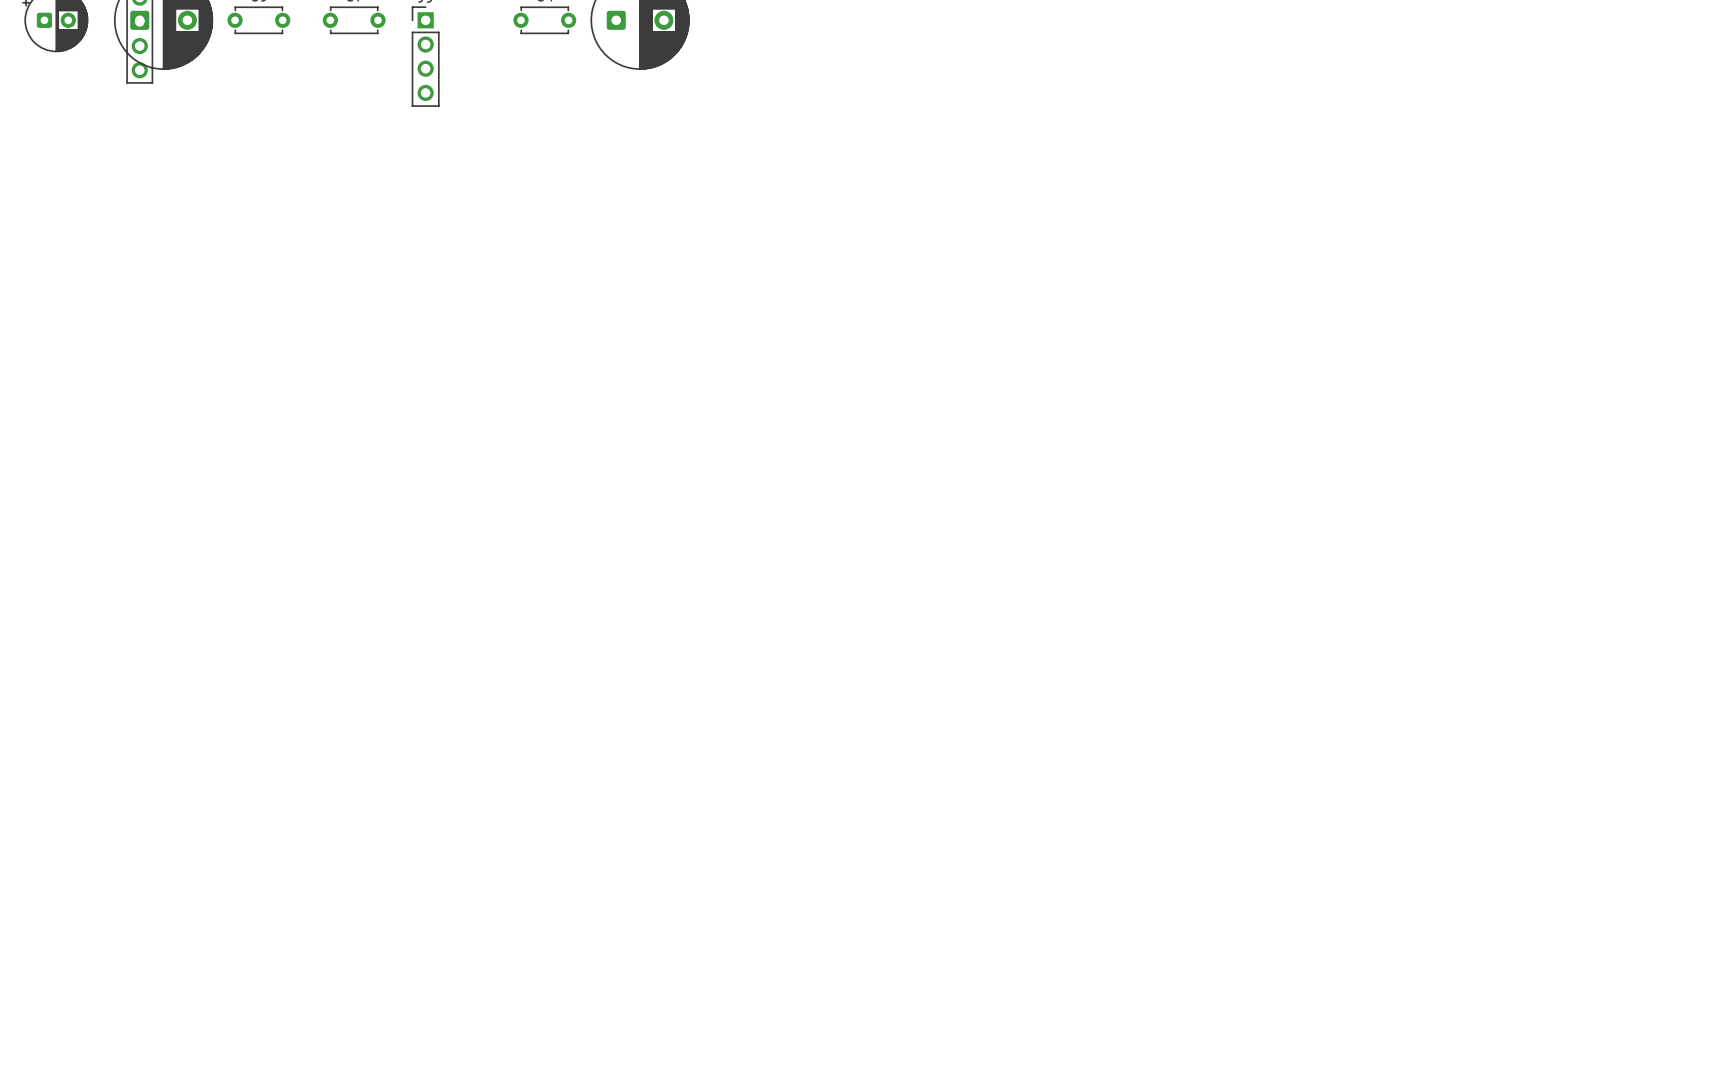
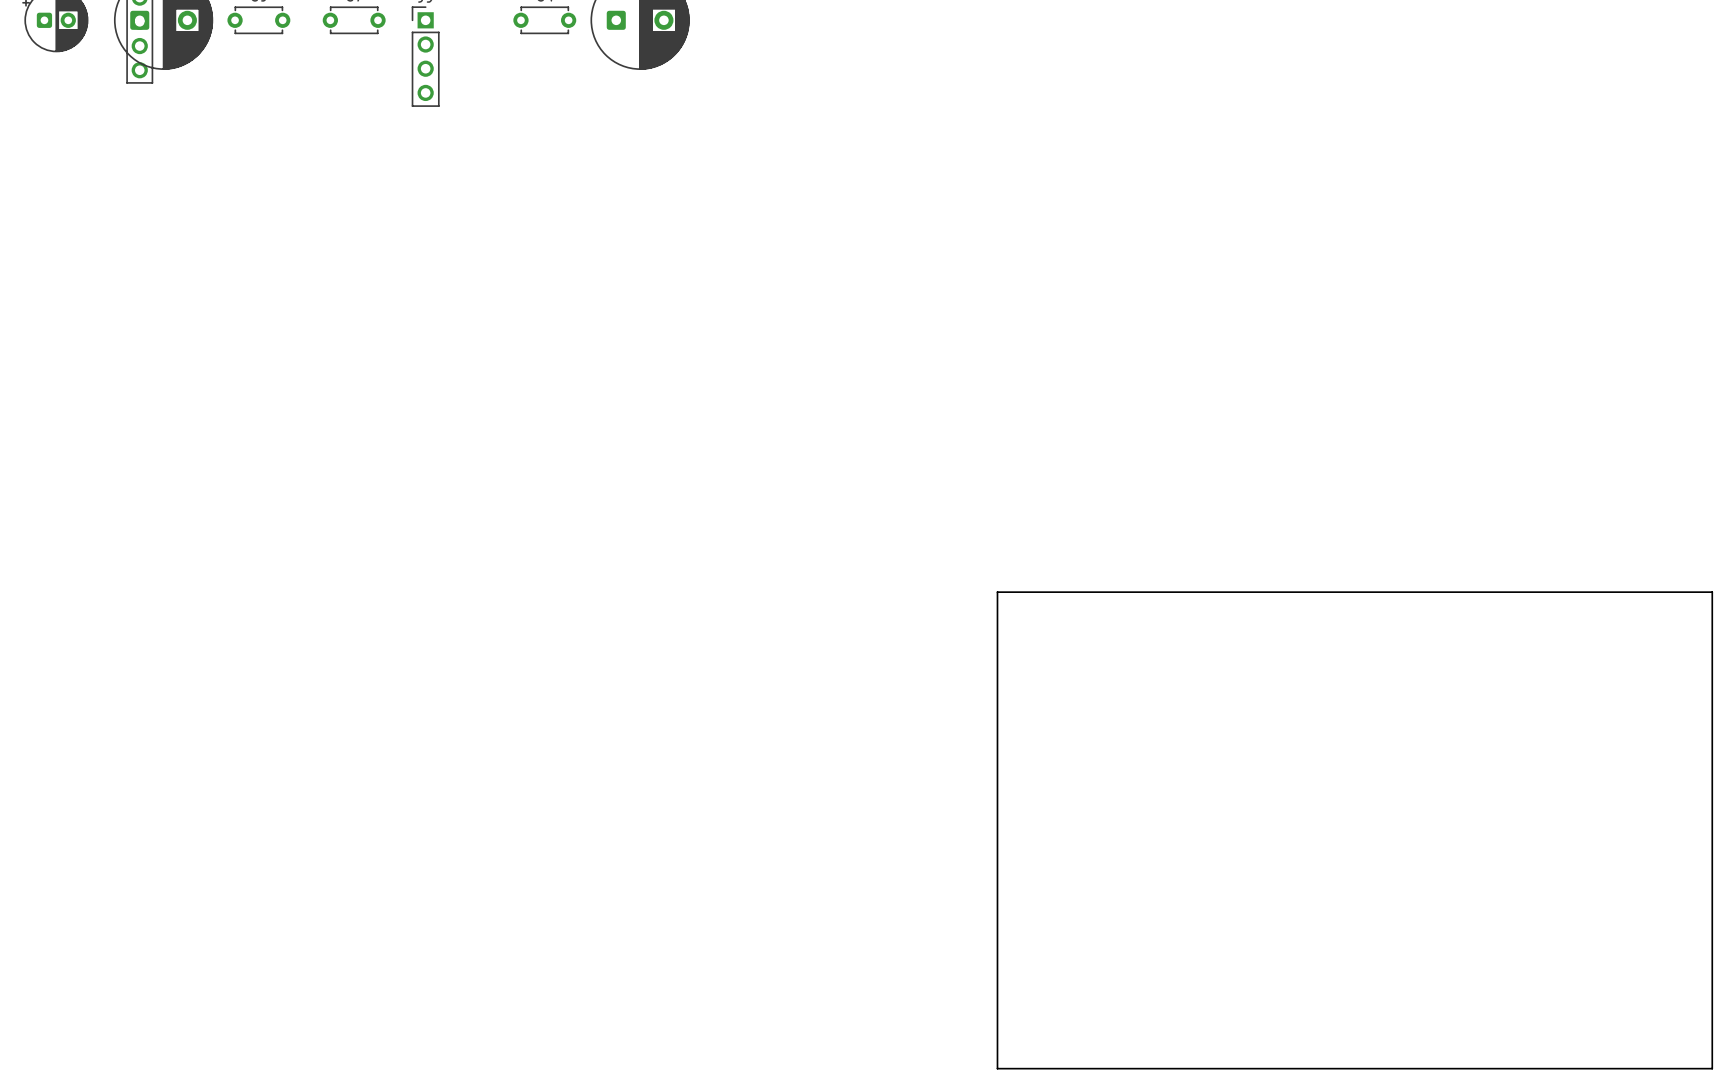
board edge: none -> (997, 592) (1712, 592) (1712, 1068) (997, 1068) (997, 592)

